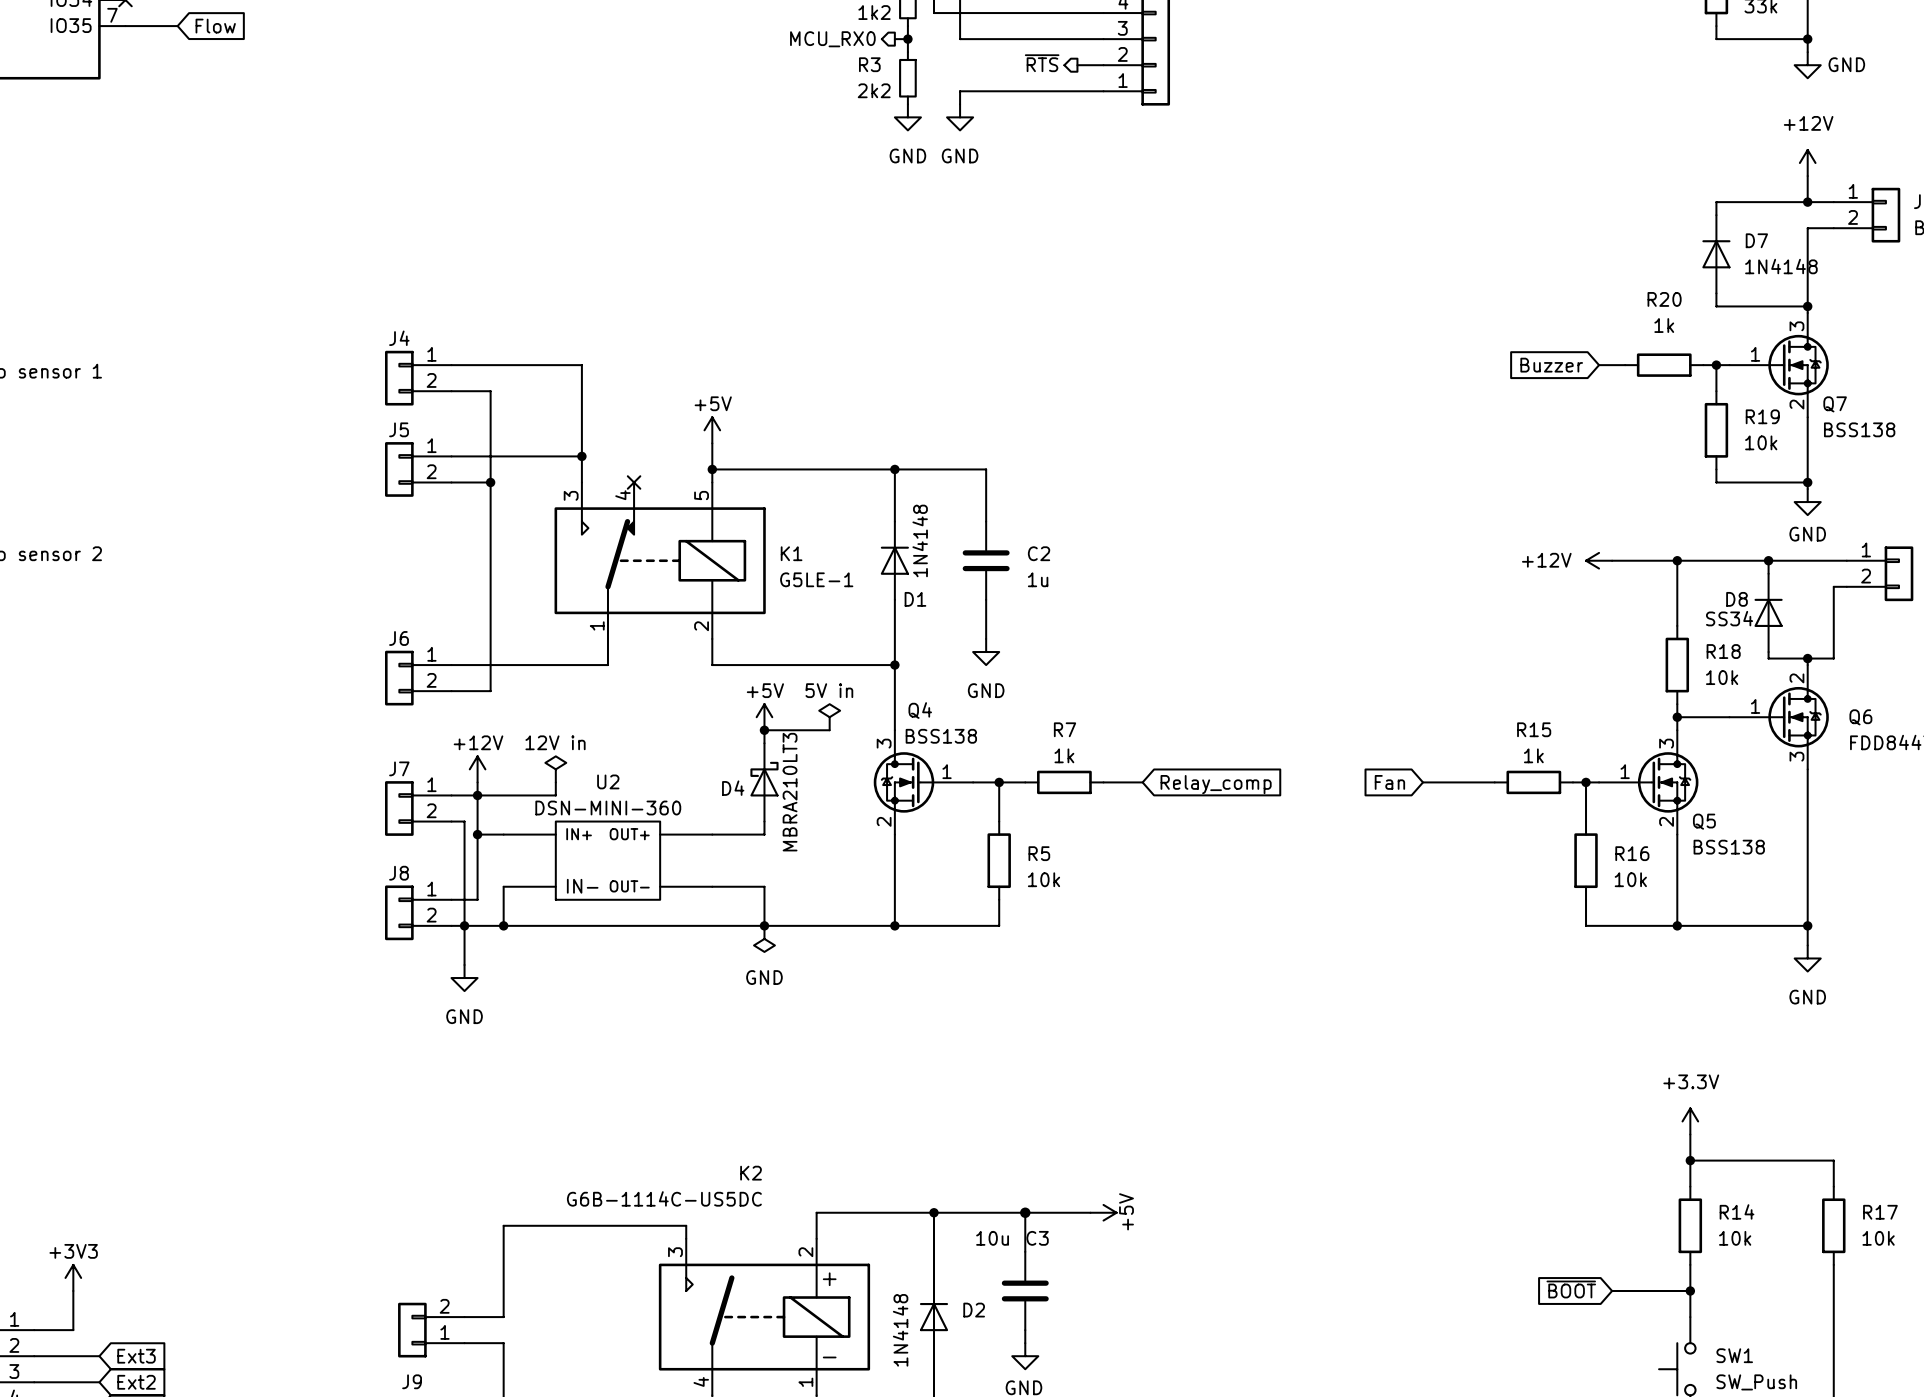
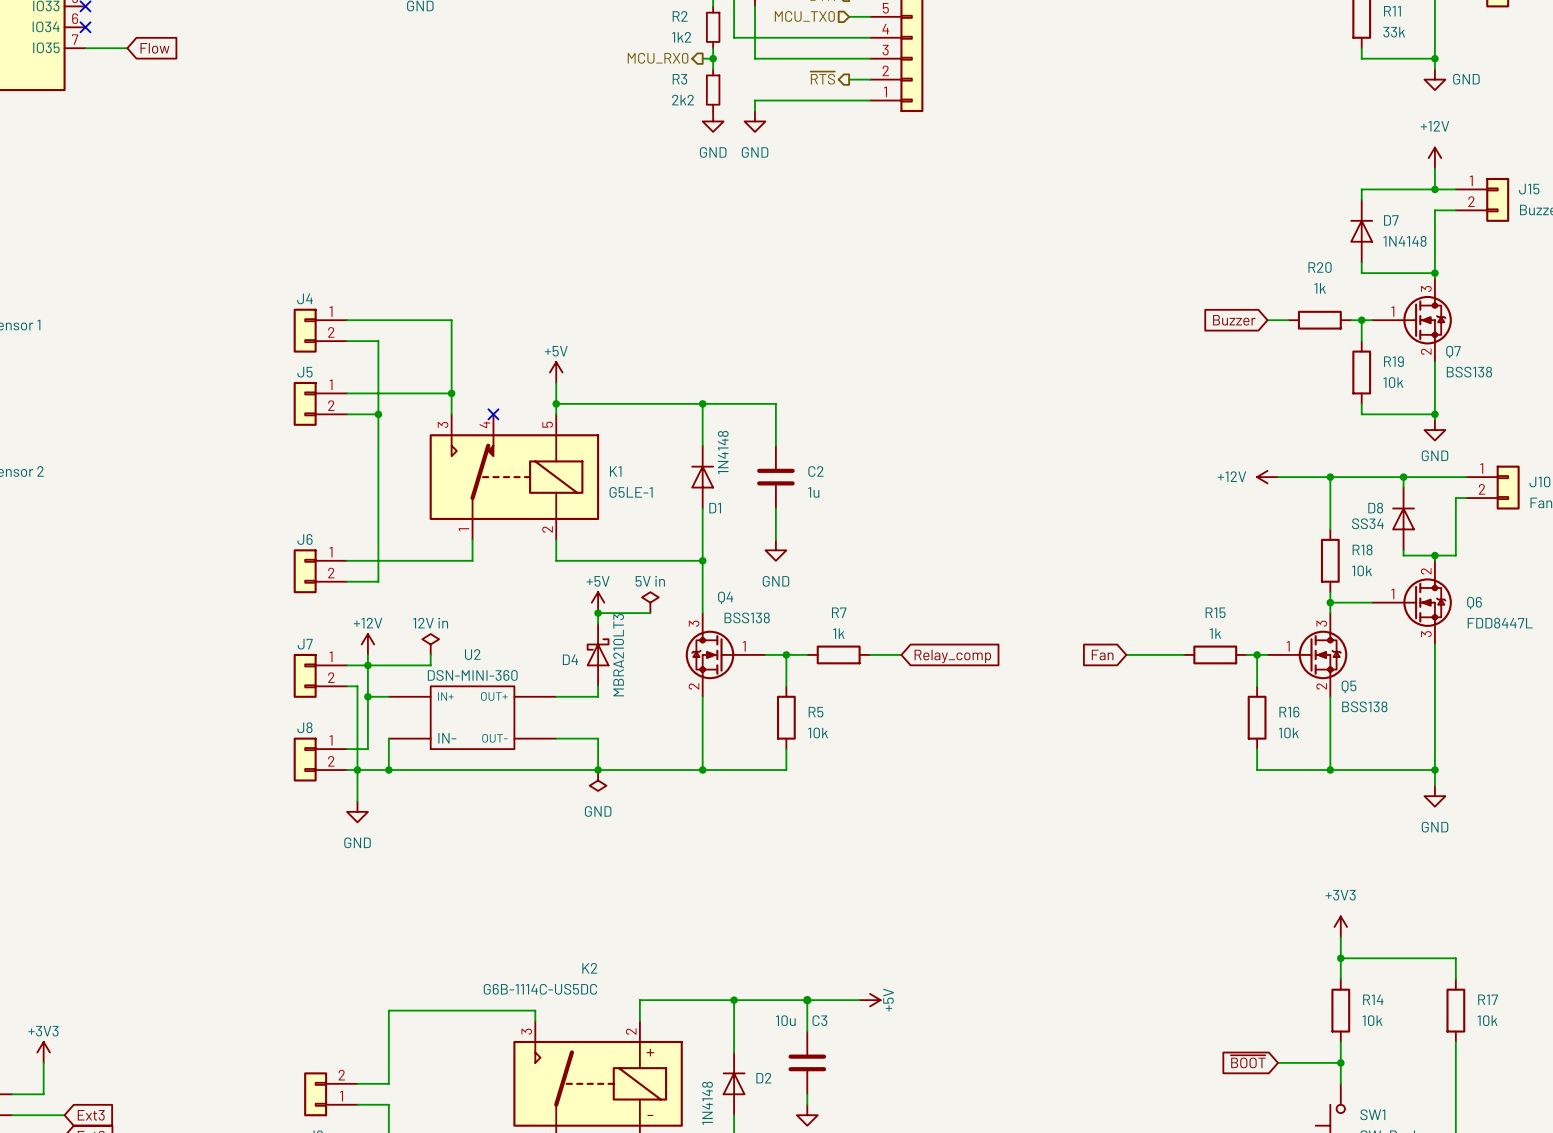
power symbol: +3.3V (1690, 1121) -> +3V3 (1340, 926)

